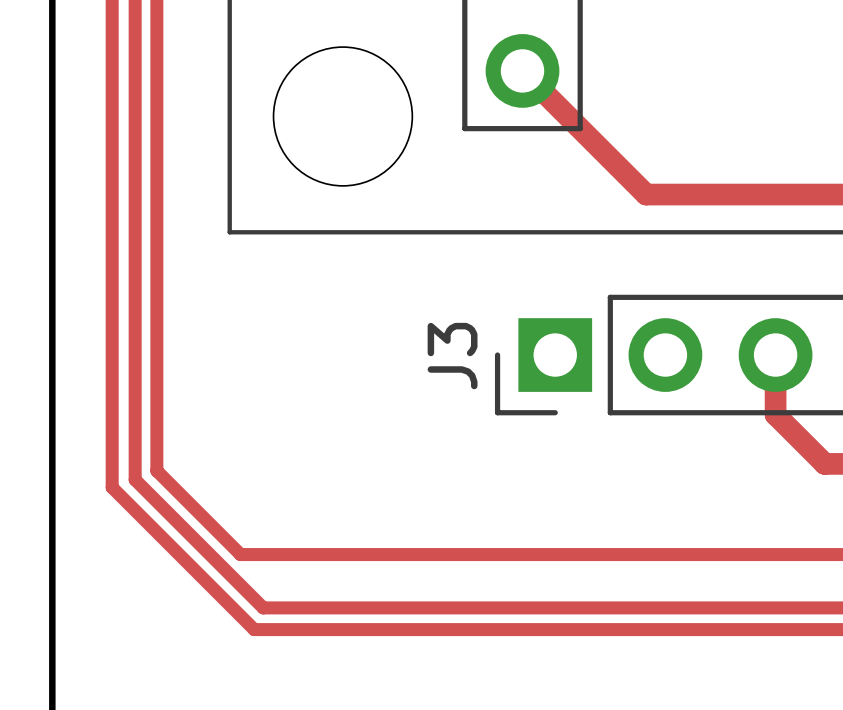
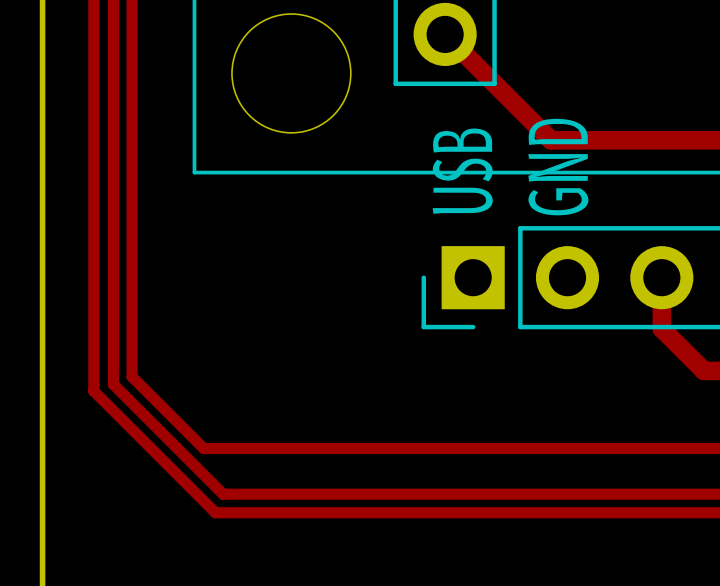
text: none -> USB (462, 171)
text: none -> GND (558, 167)
J3 name: J3 (452, 356) -> none

